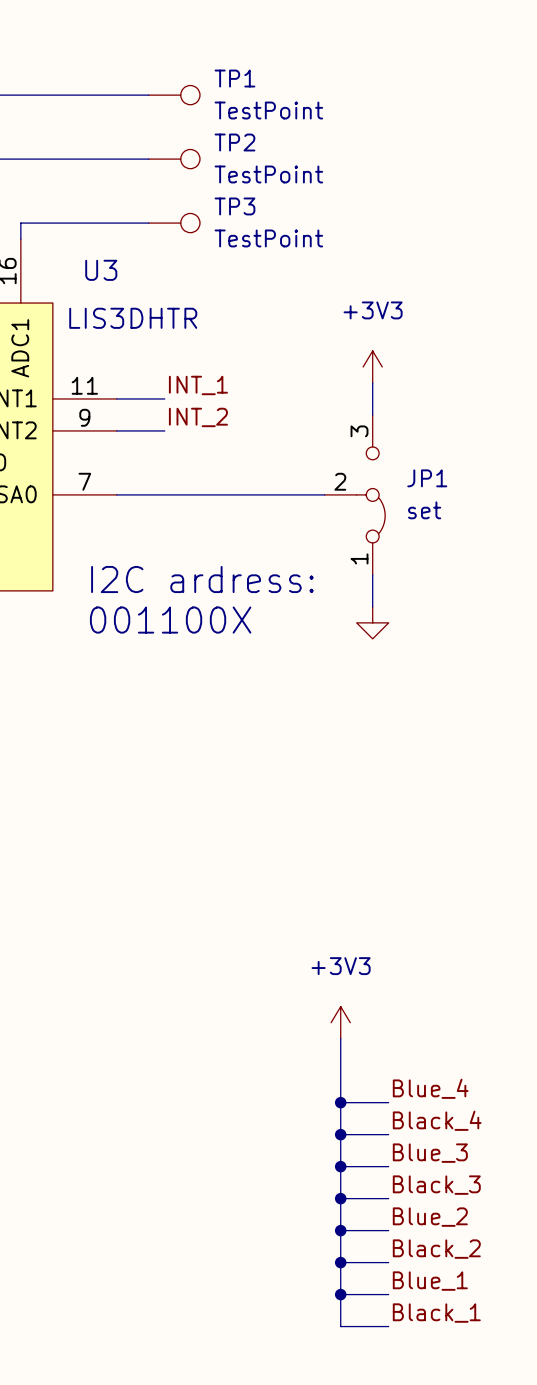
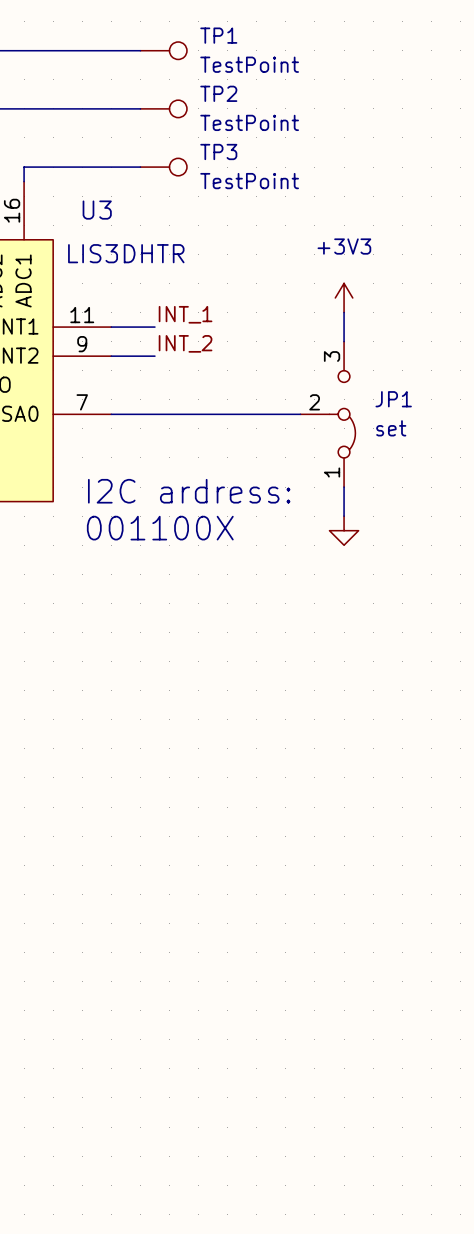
power symbol: +3V3 (340, 1022) -> none
wire: (340, 1038) (340, 1326) (388, 1326) -> none
label: Blue_4 (430, 1088) -> none
wire: (340, 1102) (388, 1102) -> none
junction: (340, 1102) -> none
label: Black_4 (437, 1120) -> none
wire: (340, 1134) (388, 1134) -> none
junction: (340, 1134) -> none
label: Blue_3 (430, 1153) -> none
wire: (340, 1166) (388, 1166) -> none
junction: (340, 1166) -> none
label: Black_3 (436, 1185) -> none
wire: (340, 1198) (388, 1198) -> none
junction: (340, 1198) -> none
label: Blue_2 (430, 1217) -> none
wire: (340, 1230) (388, 1230) -> none
junction: (340, 1230) -> none
label: Black_2 (436, 1249) -> none
wire: (340, 1262) (388, 1262) -> none
junction: (340, 1262) -> none
label: Blue_1 (430, 1281) -> none
wire: (340, 1294) (388, 1294) -> none
junction: (340, 1294) -> none
label: Black_1 (436, 1313) -> none

